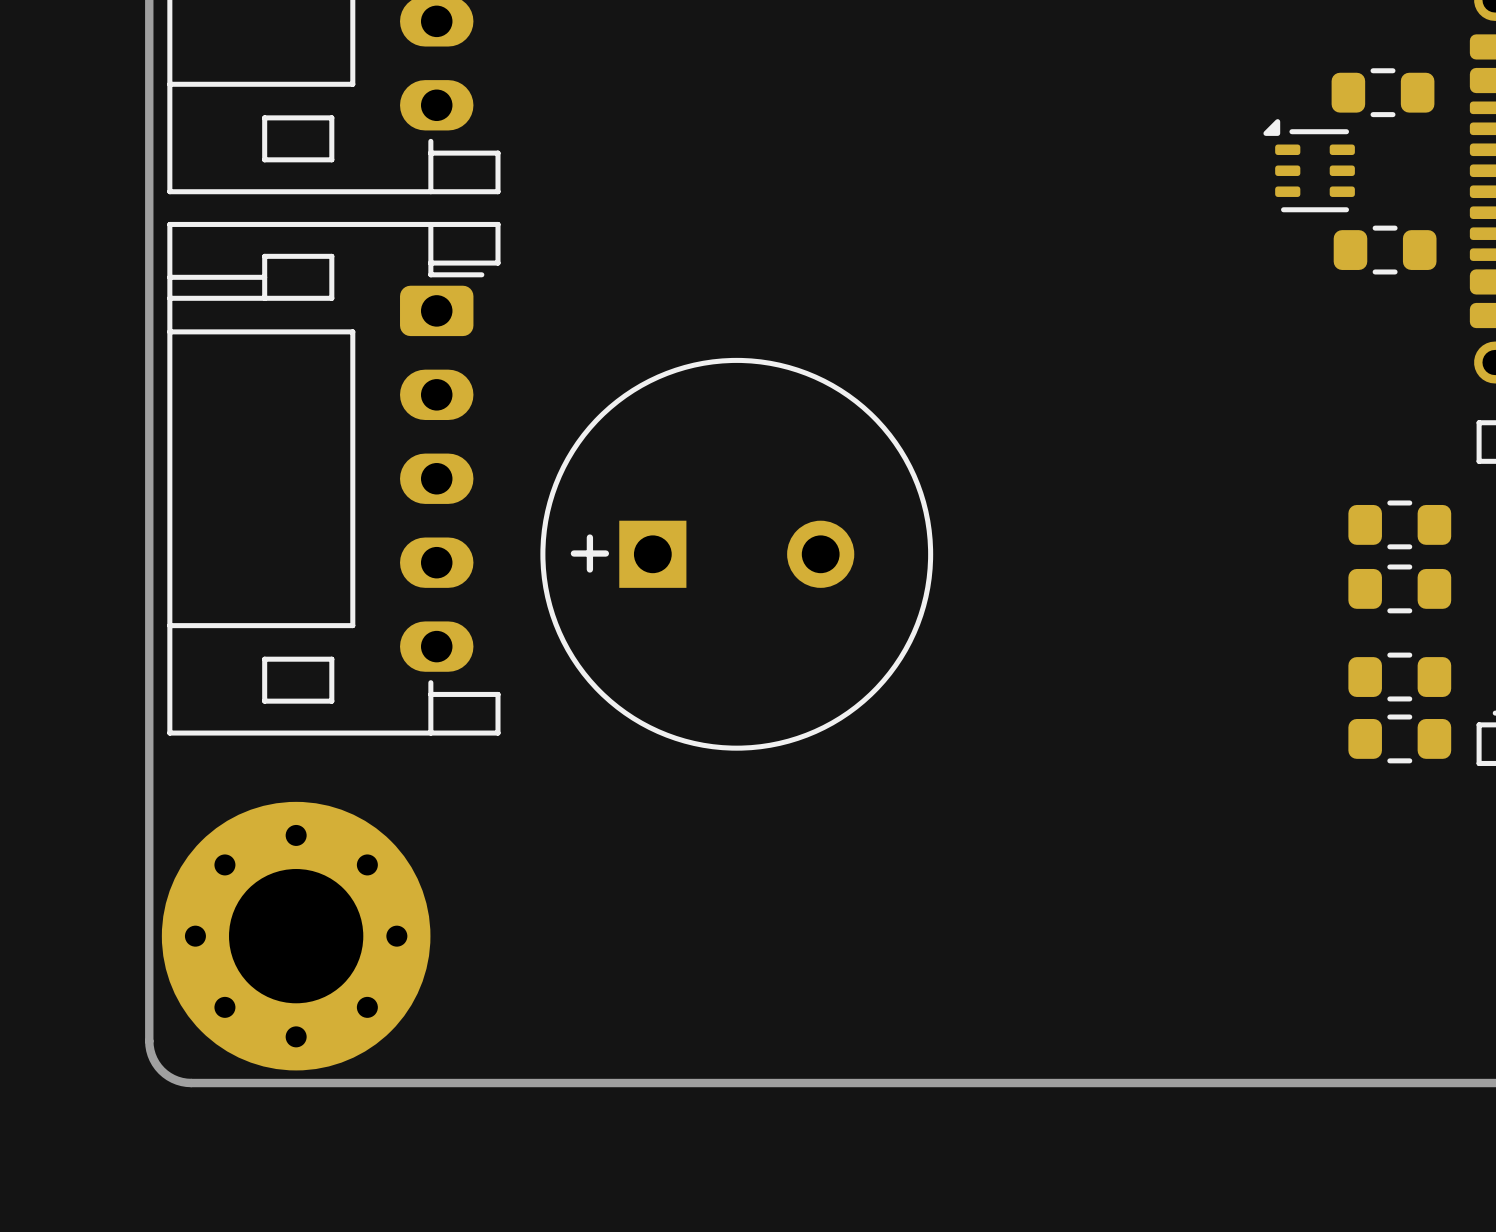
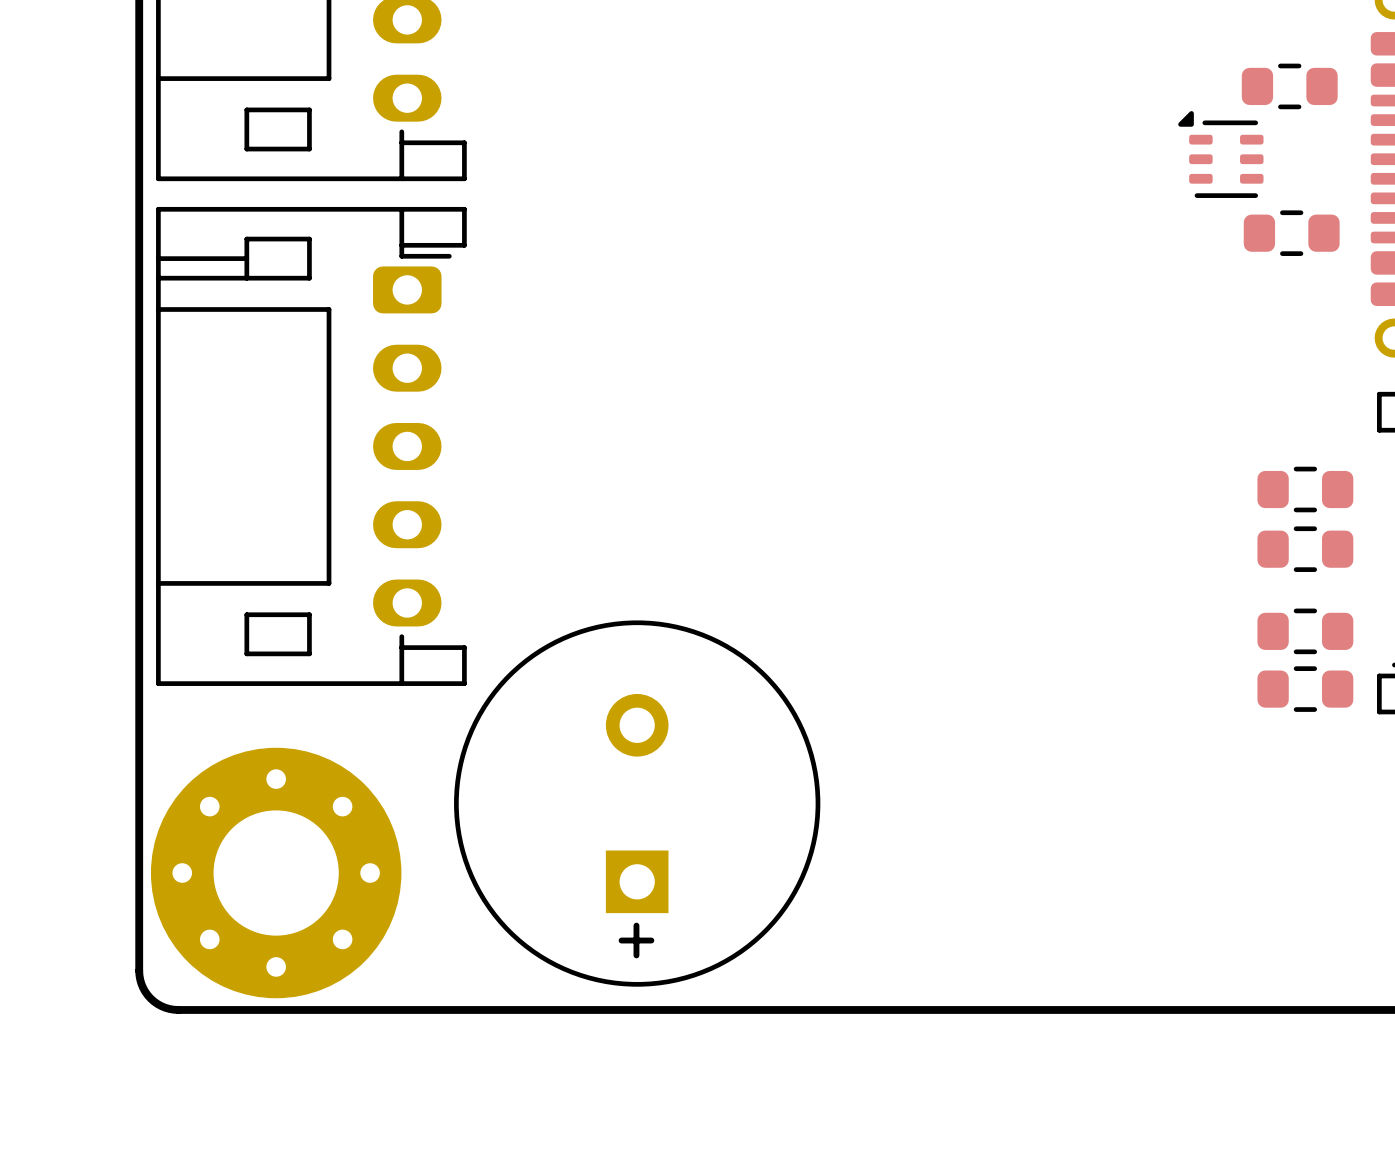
part rotation: 0° (736, 554) -> 90° counterclockwise (637, 803)
part position: (736, 554) -> (637, 803)

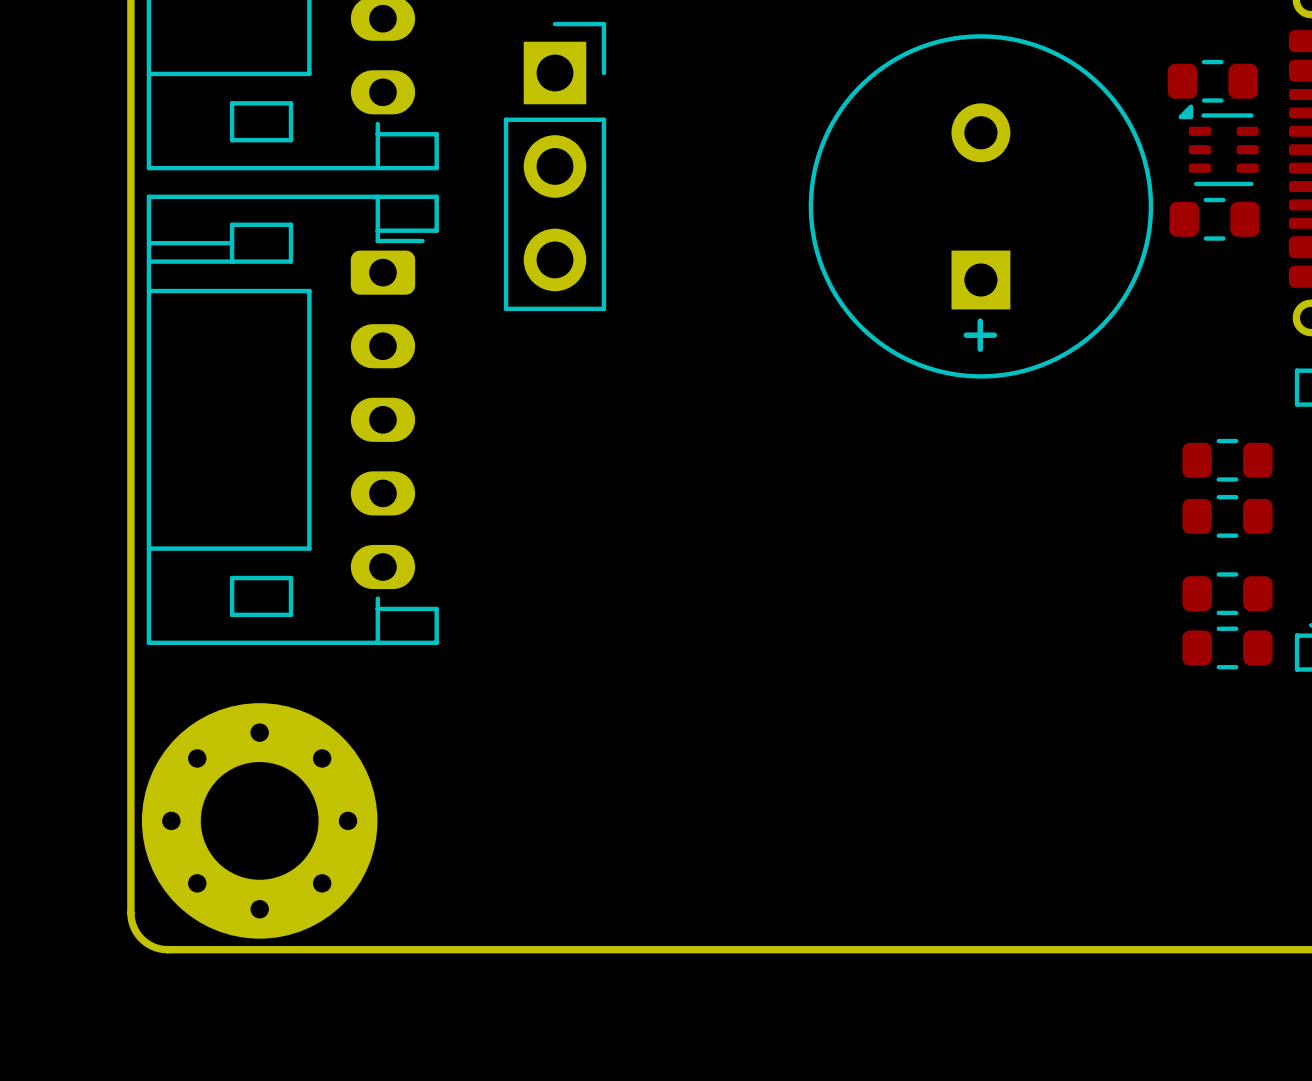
part position: (1220, 154) -> (1218, 145)
part: none -> (554, 166)
part position: (637, 803) -> (980, 206)

